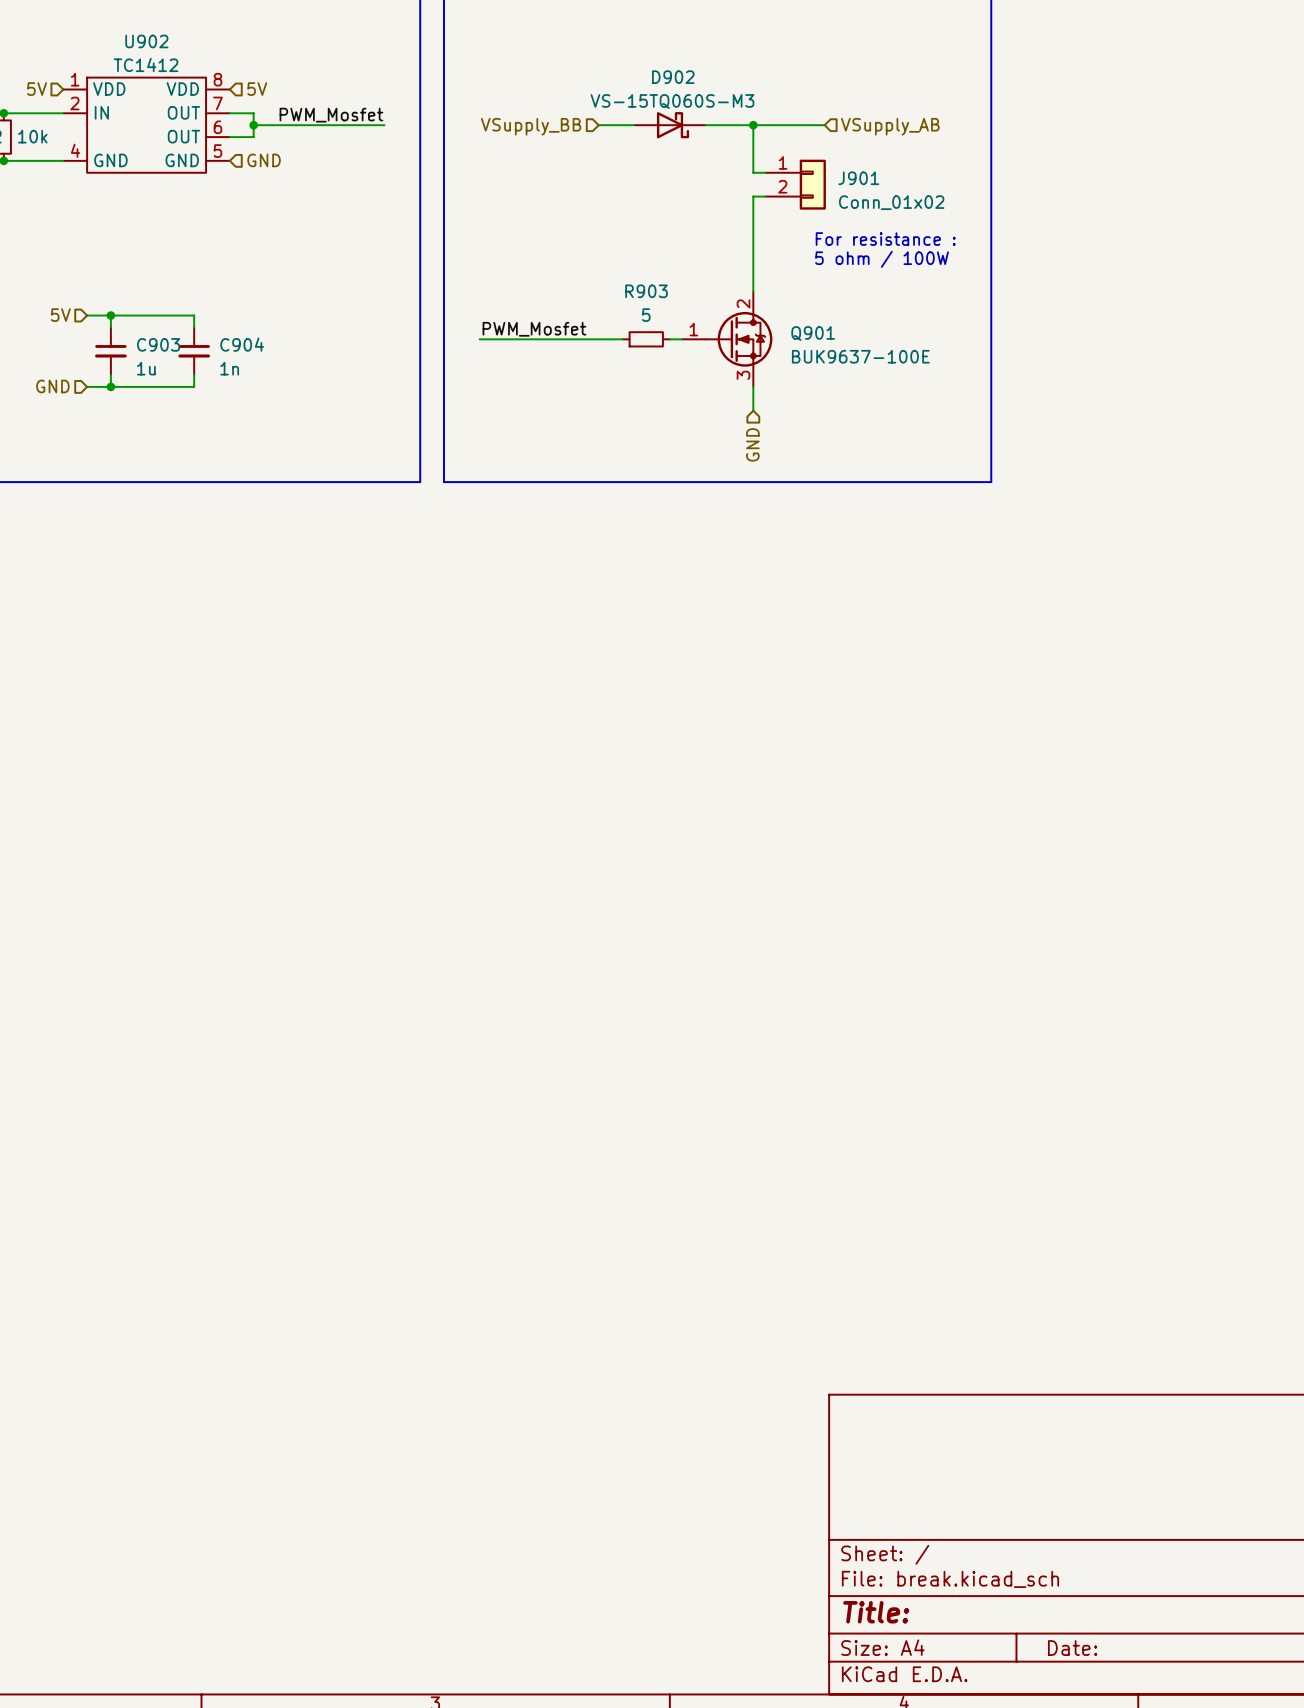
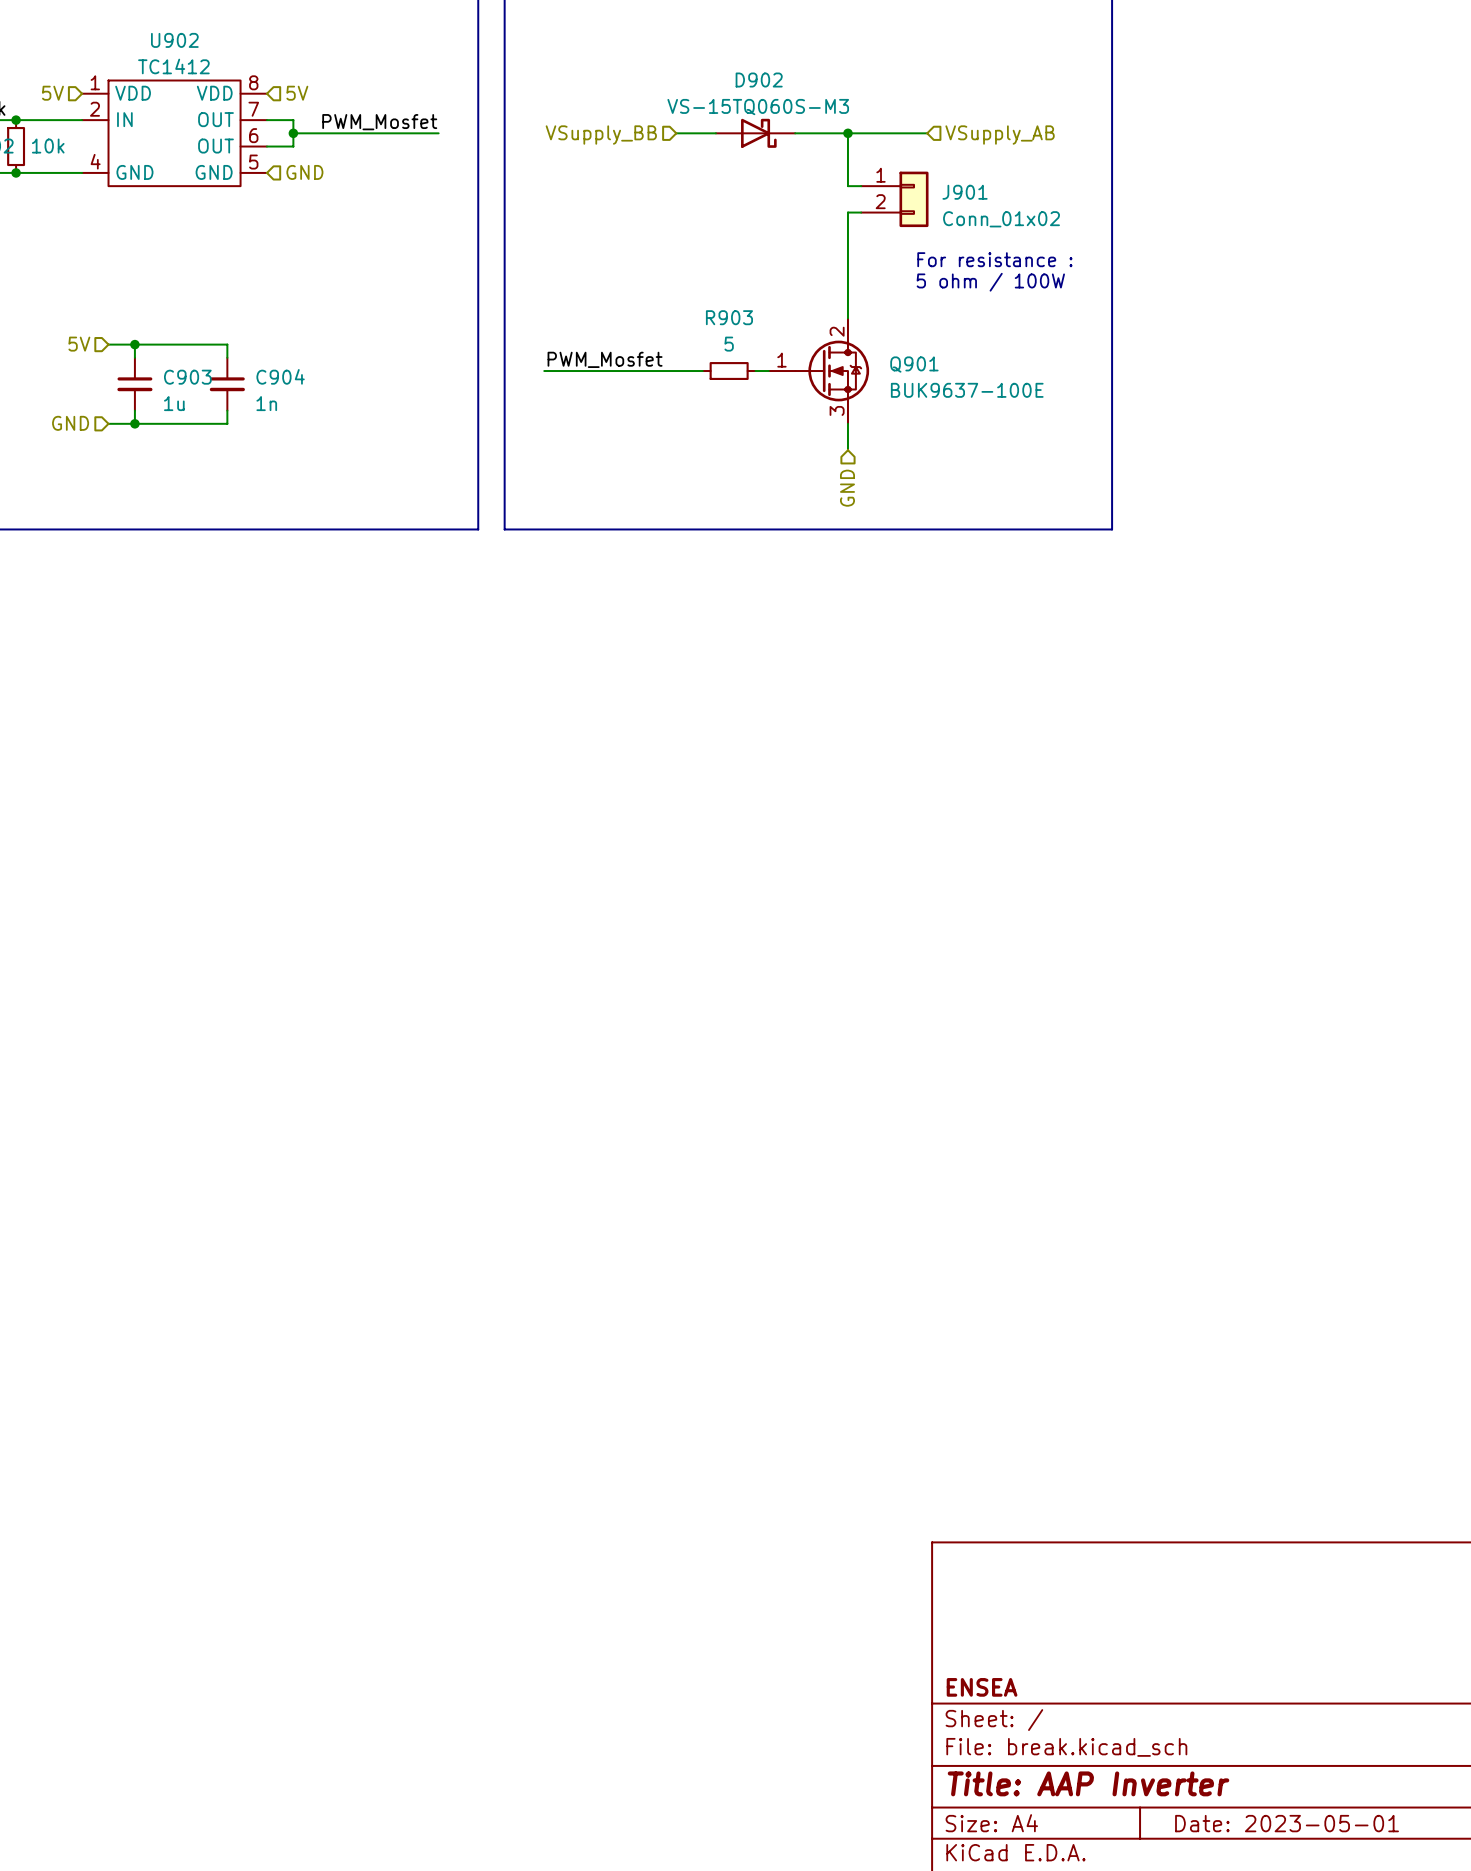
title block: none -> ENSEA (982, 1687)
title block: Title: (876, 1612) -> Title: AAP Inverter (1088, 1783)
title block: Date: (1072, 1648) -> Date: 2023-05-01 (1287, 1823)

